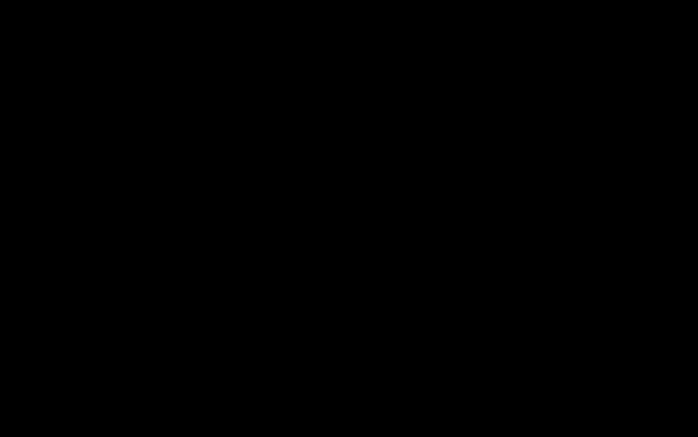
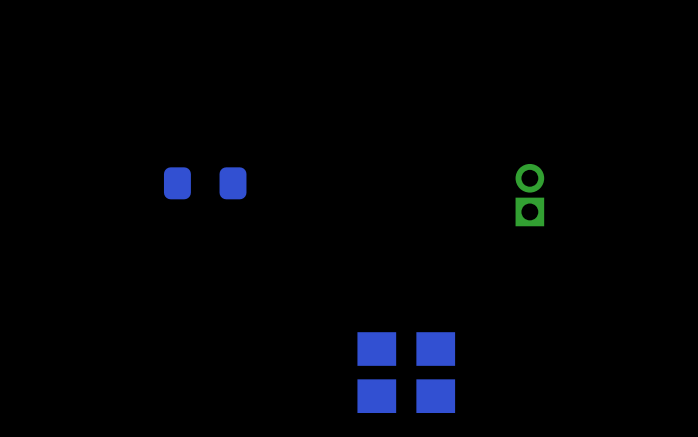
part: none -> (205, 183)
part: none -> (529, 195)
part: none -> (406, 372)

